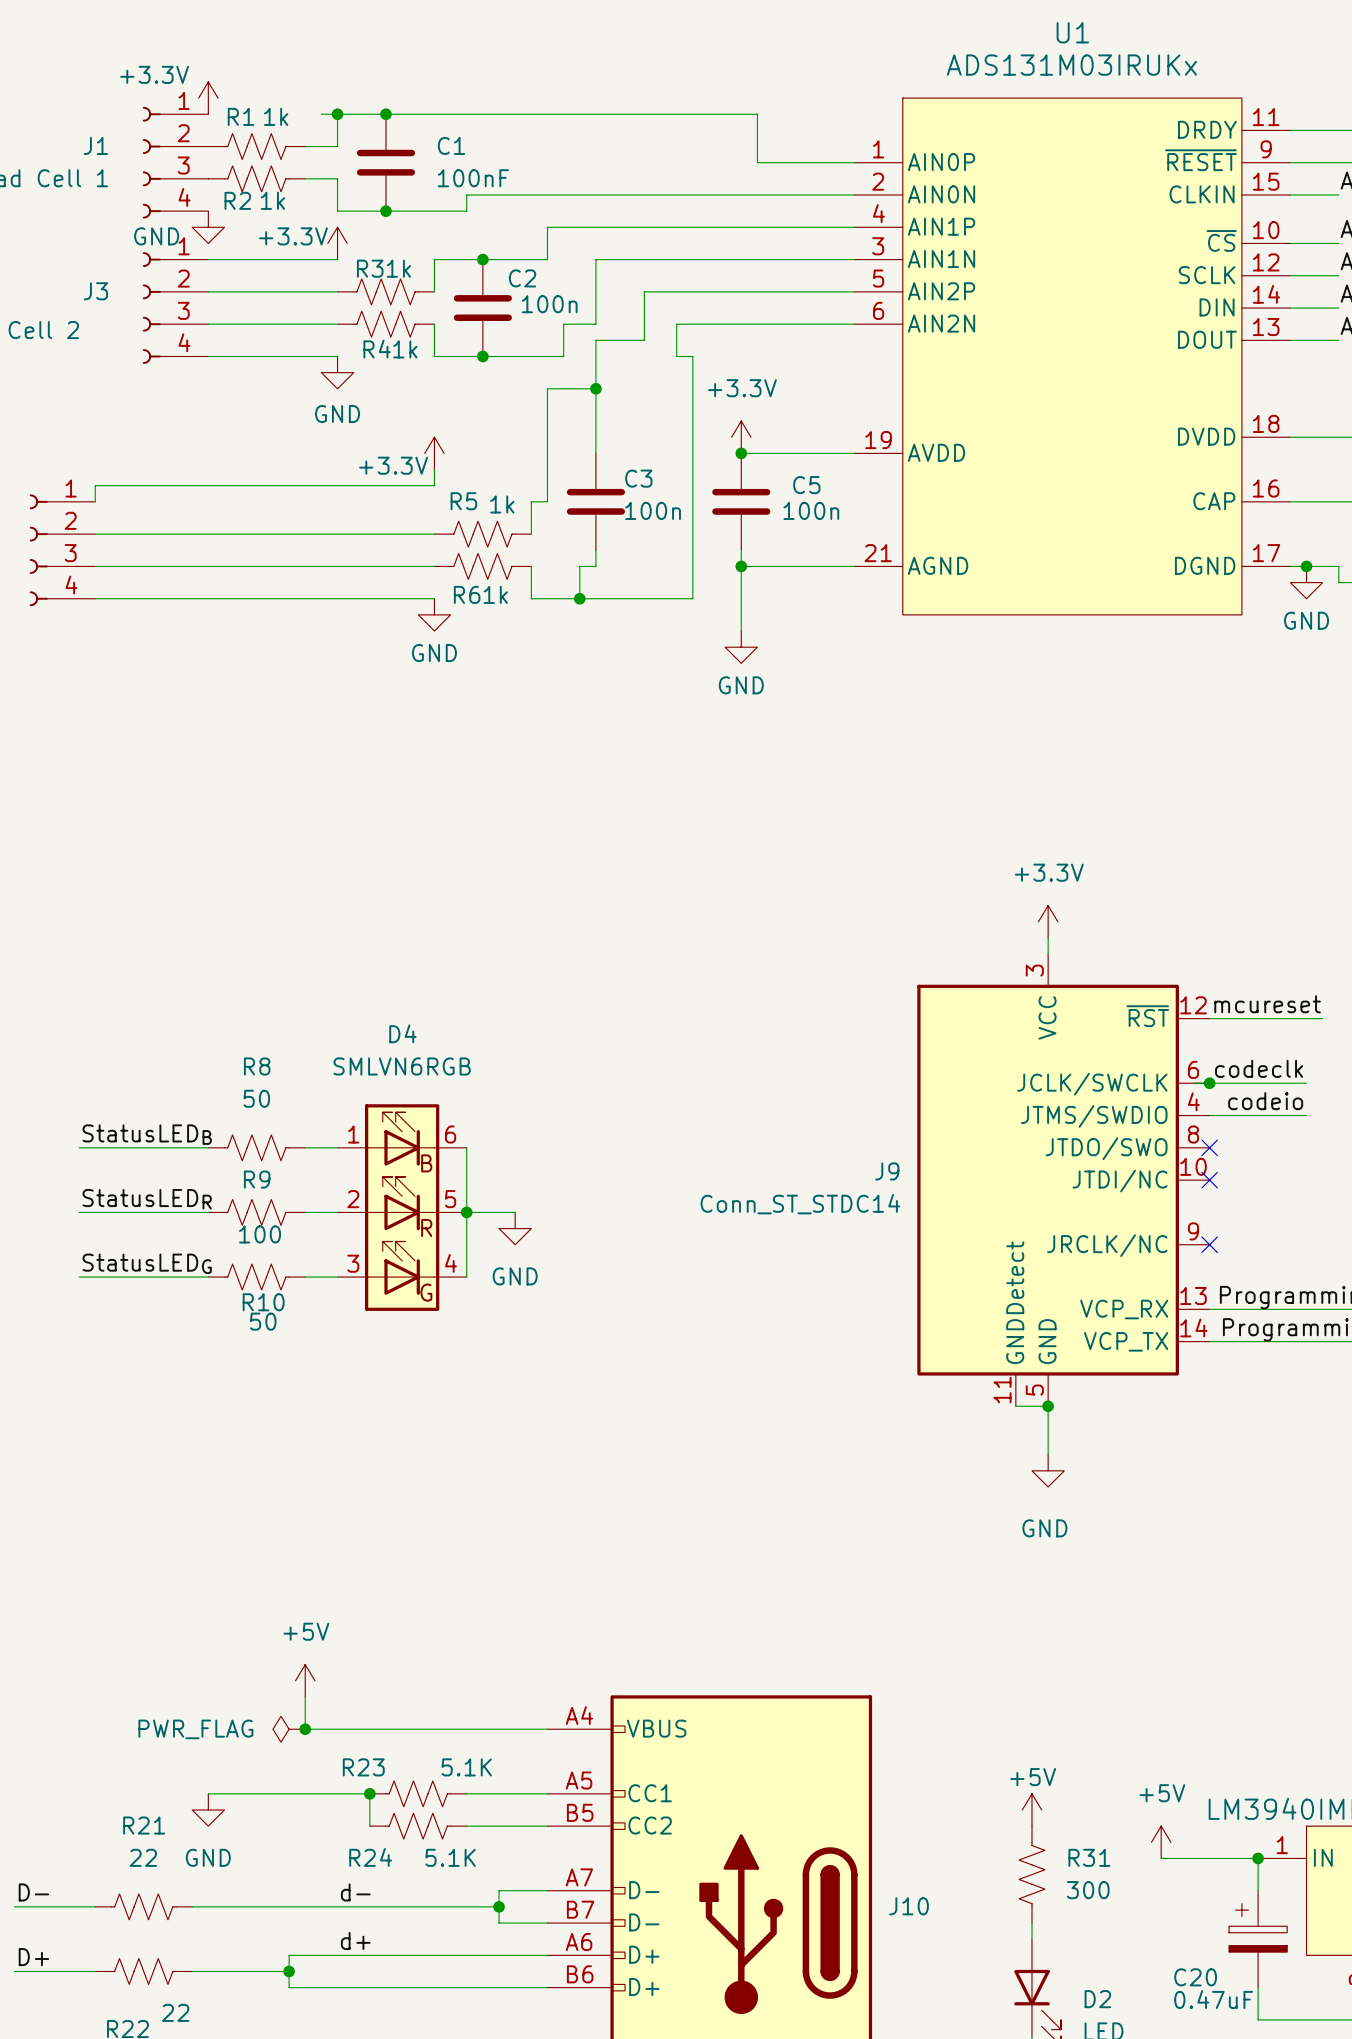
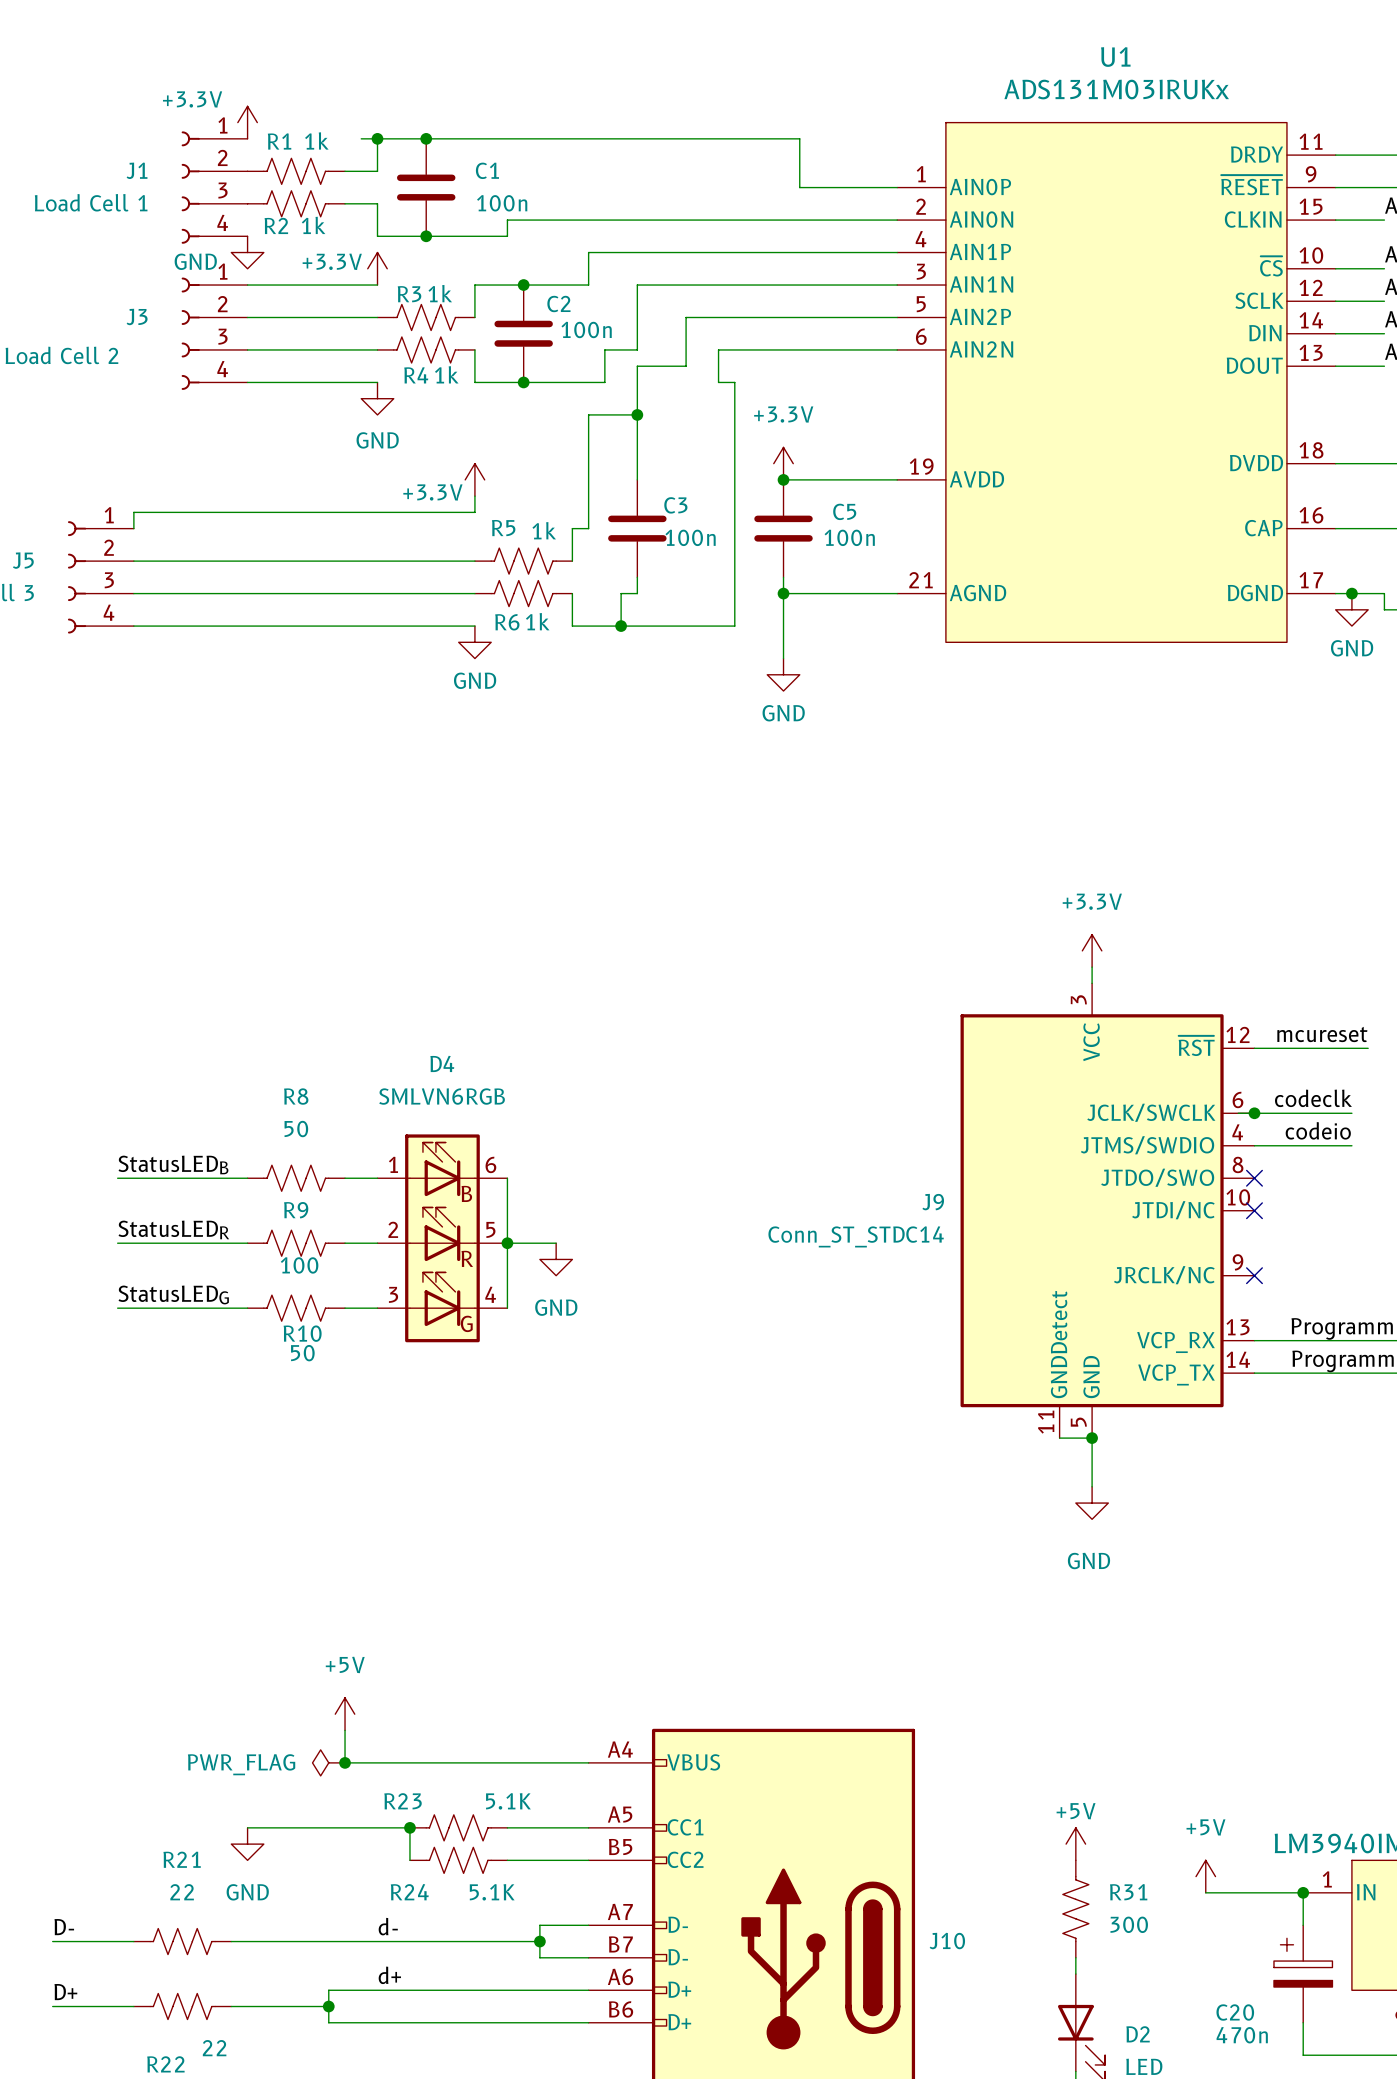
C1 value: 100nF (473, 178) -> 100n (502, 203)
C20 value: 0.47uF (1213, 1999) -> 470n (1242, 2035)

